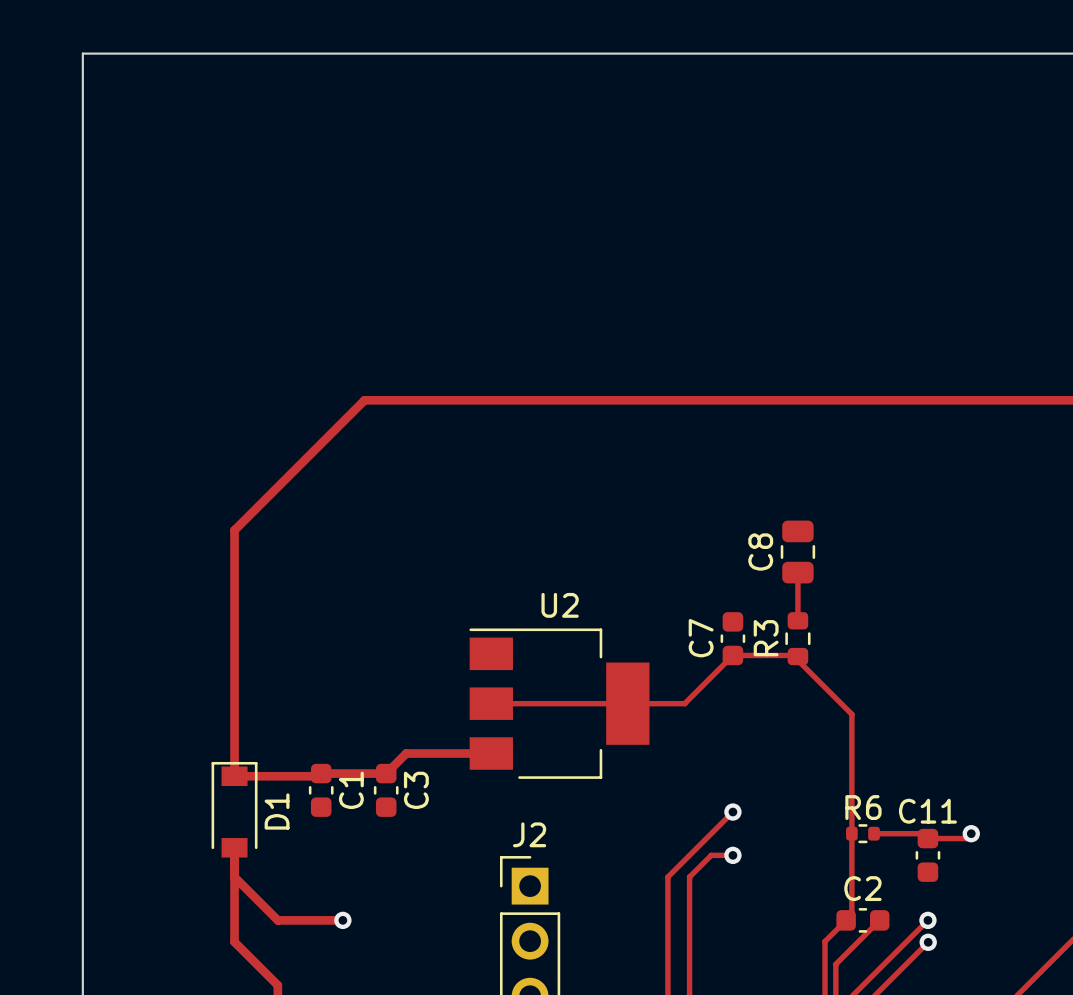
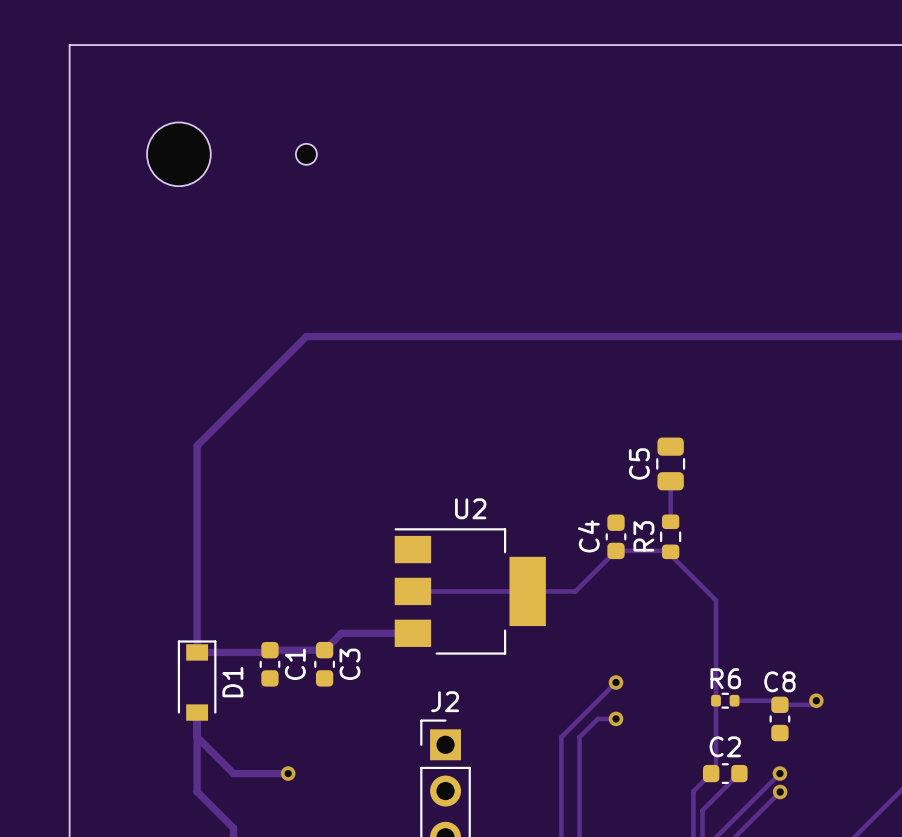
part: none -> (178, 154)
part: none -> (306, 154)
C8 name: C8 (760, 552) -> C5 (639, 463)
C7 name: C7 (701, 638) -> C4 (588, 536)
C11 name: C11 (927, 811) -> C8 (779, 681)

